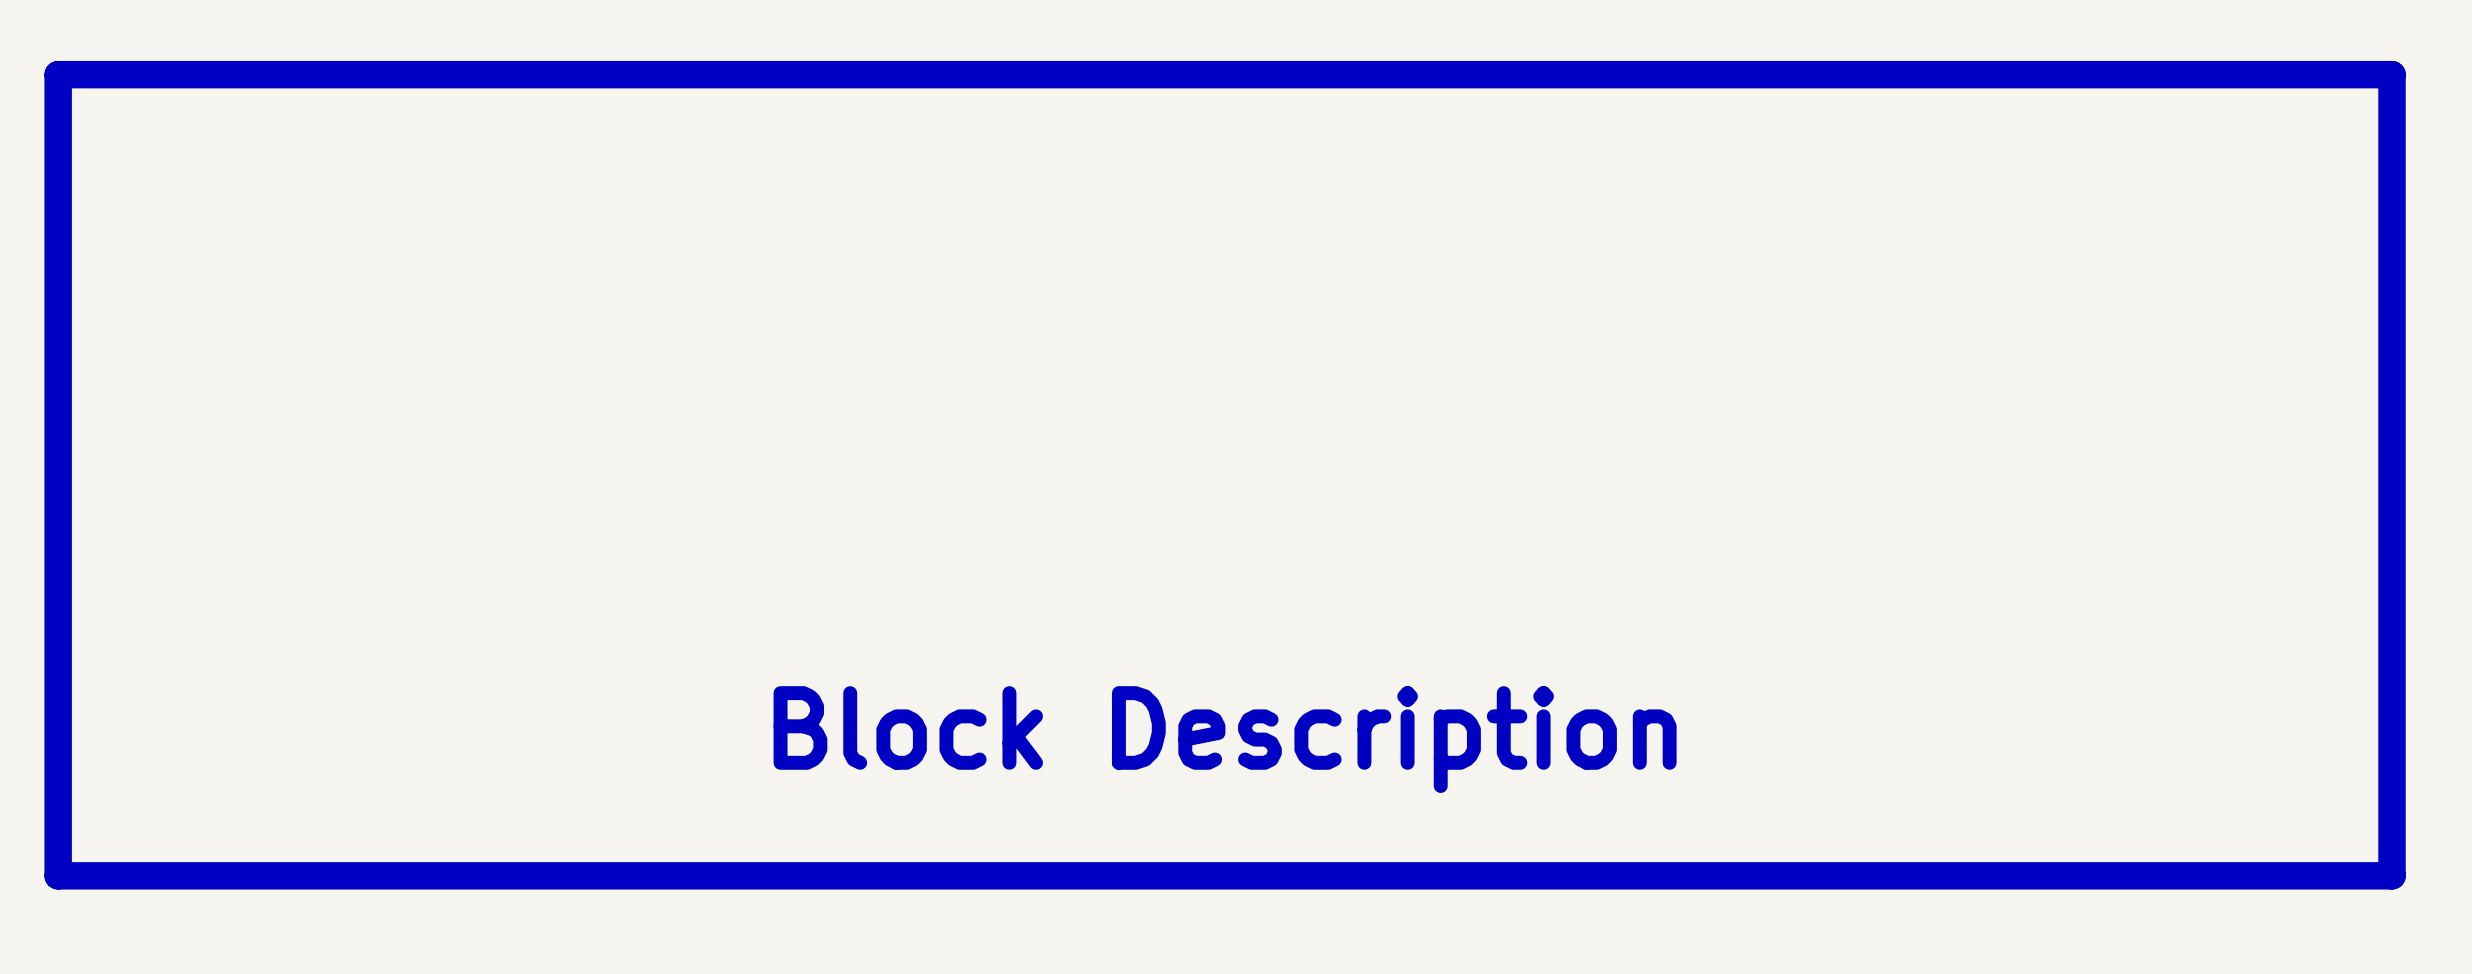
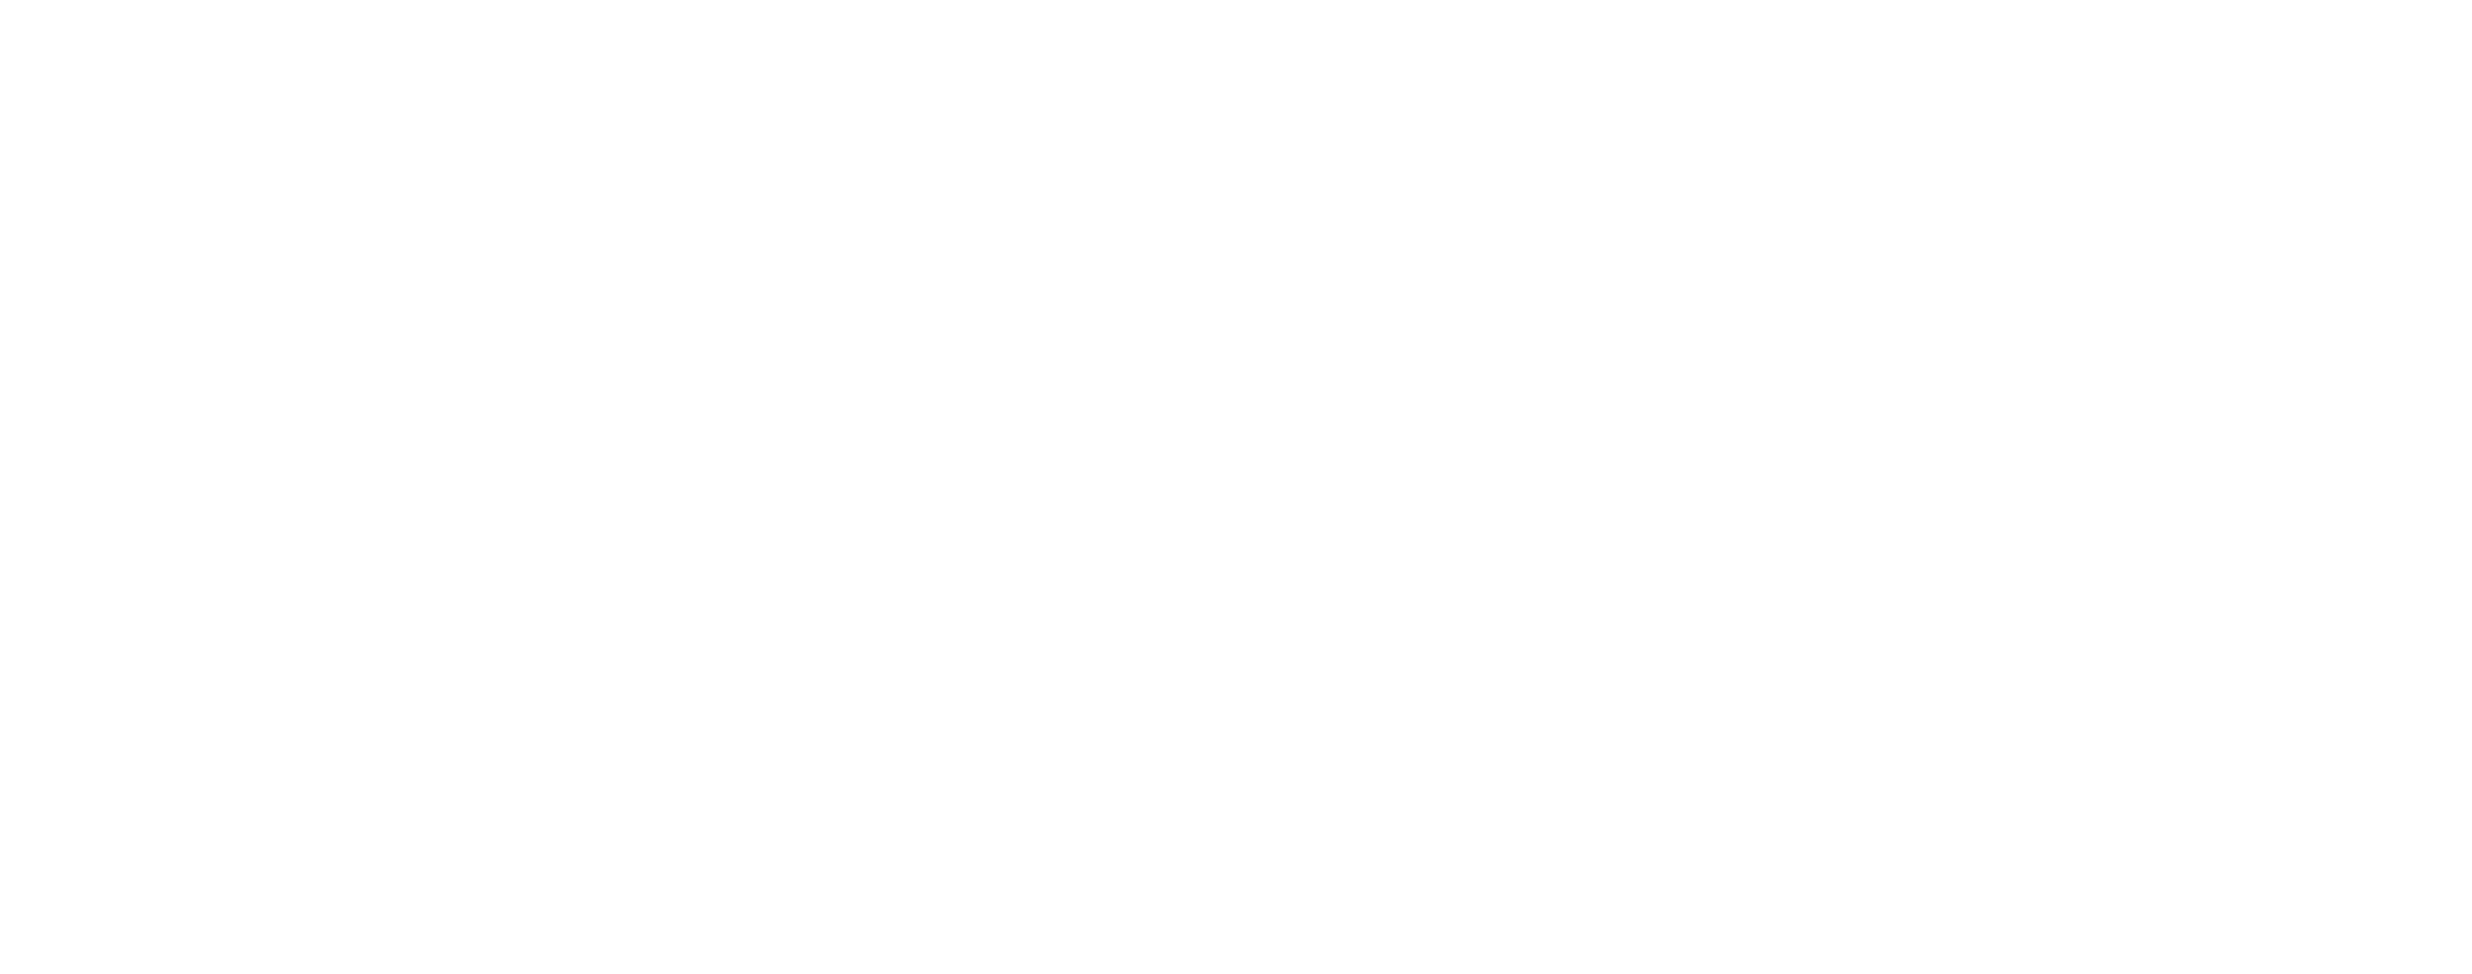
line: (58, 74) (2392, 74) (2392, 875) (58, 875) (58, 74) -> none
text: Block Description (1225, 739) -> none

